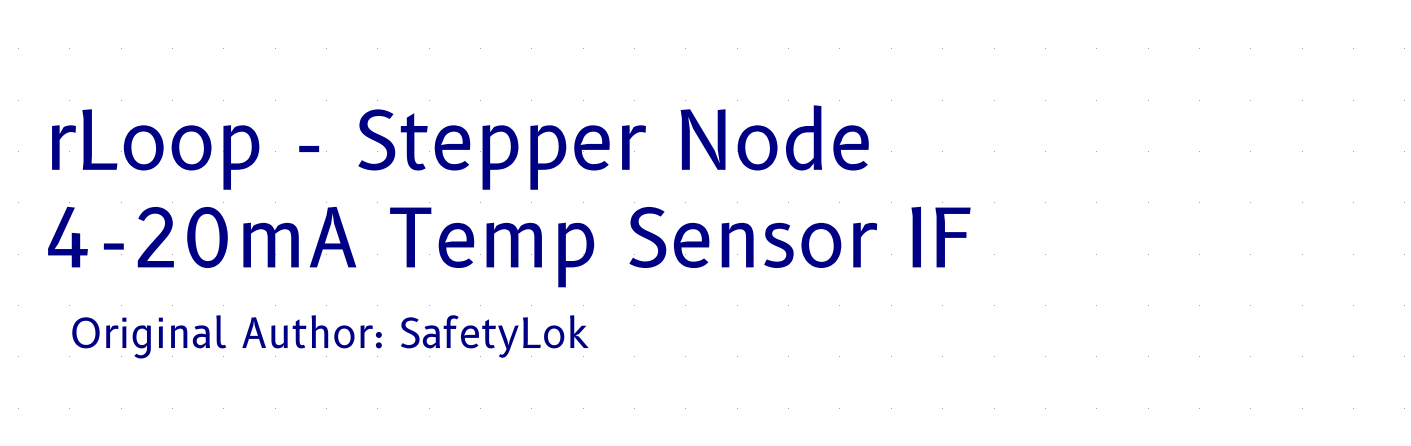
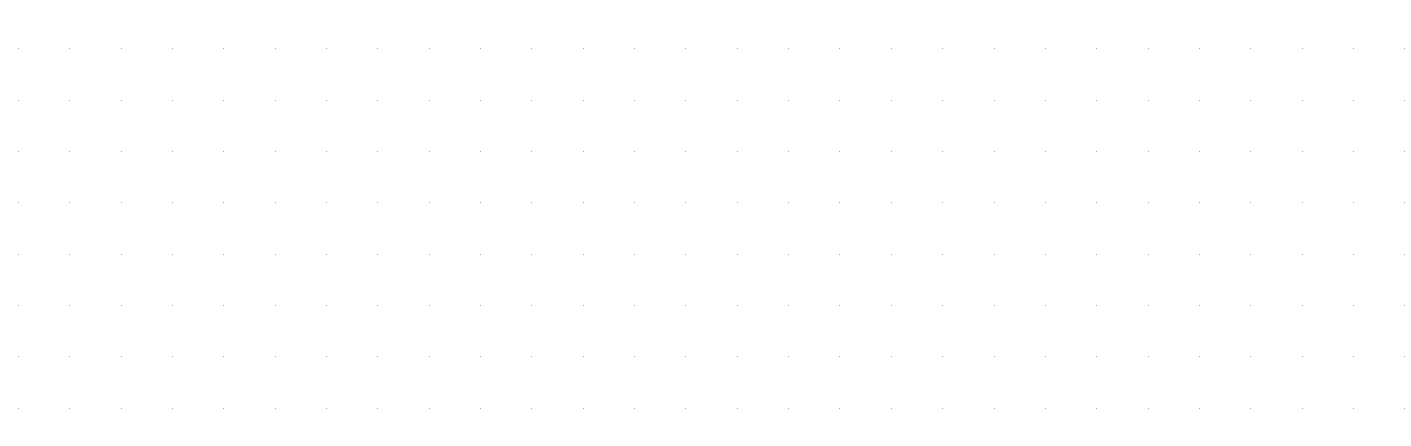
text: rLoop - Stepper Node (460, 147) -> none
text: 4-20mA Temp Sensor IF (509, 247) -> none
text: Original Author: SafetyLok (330, 336) -> none

